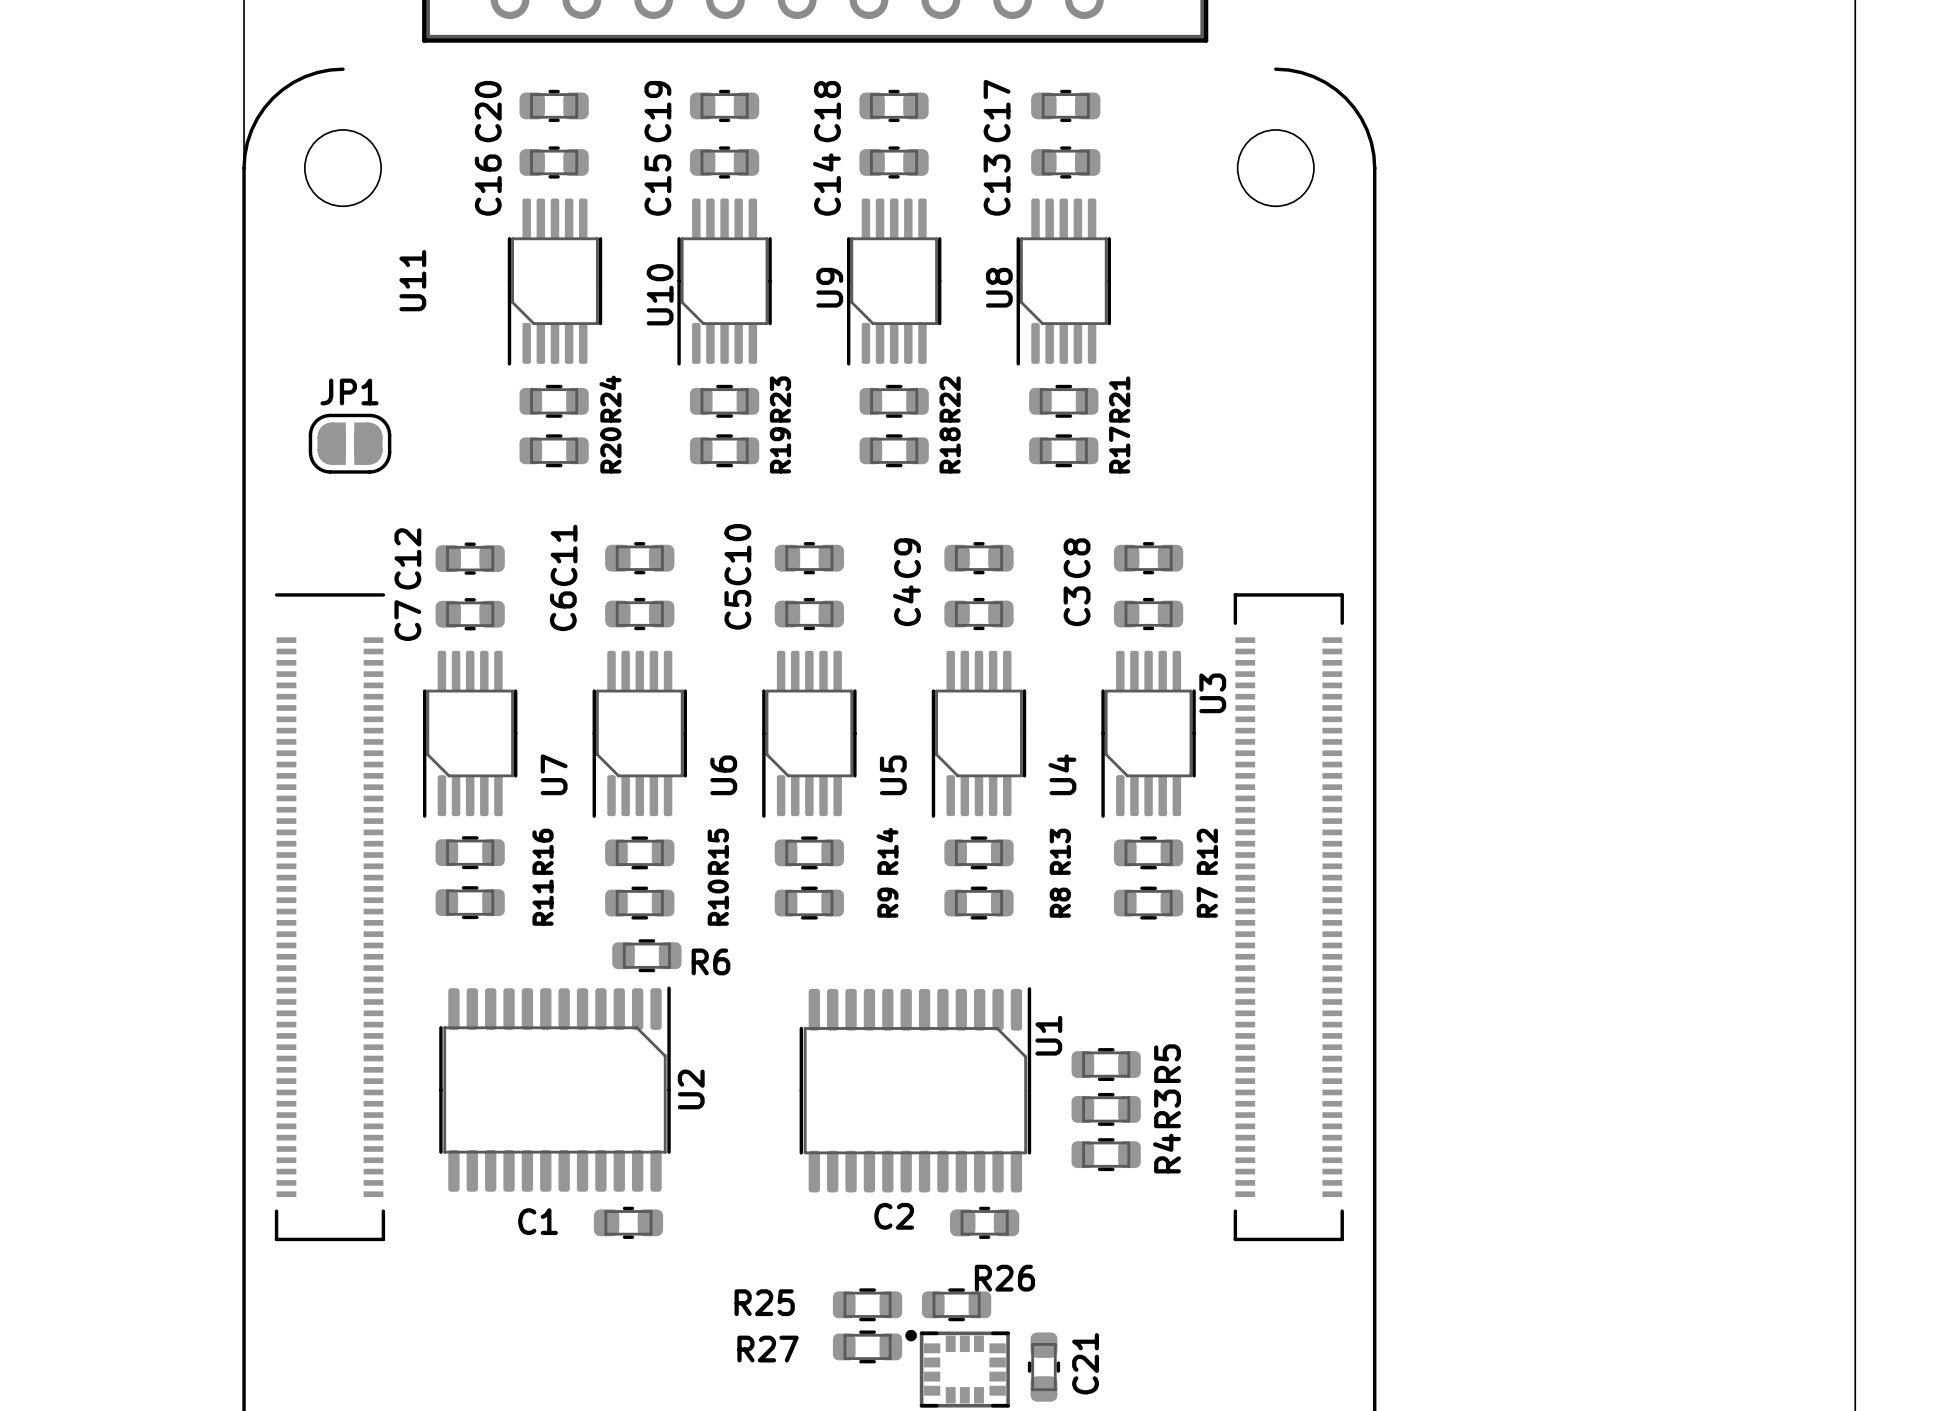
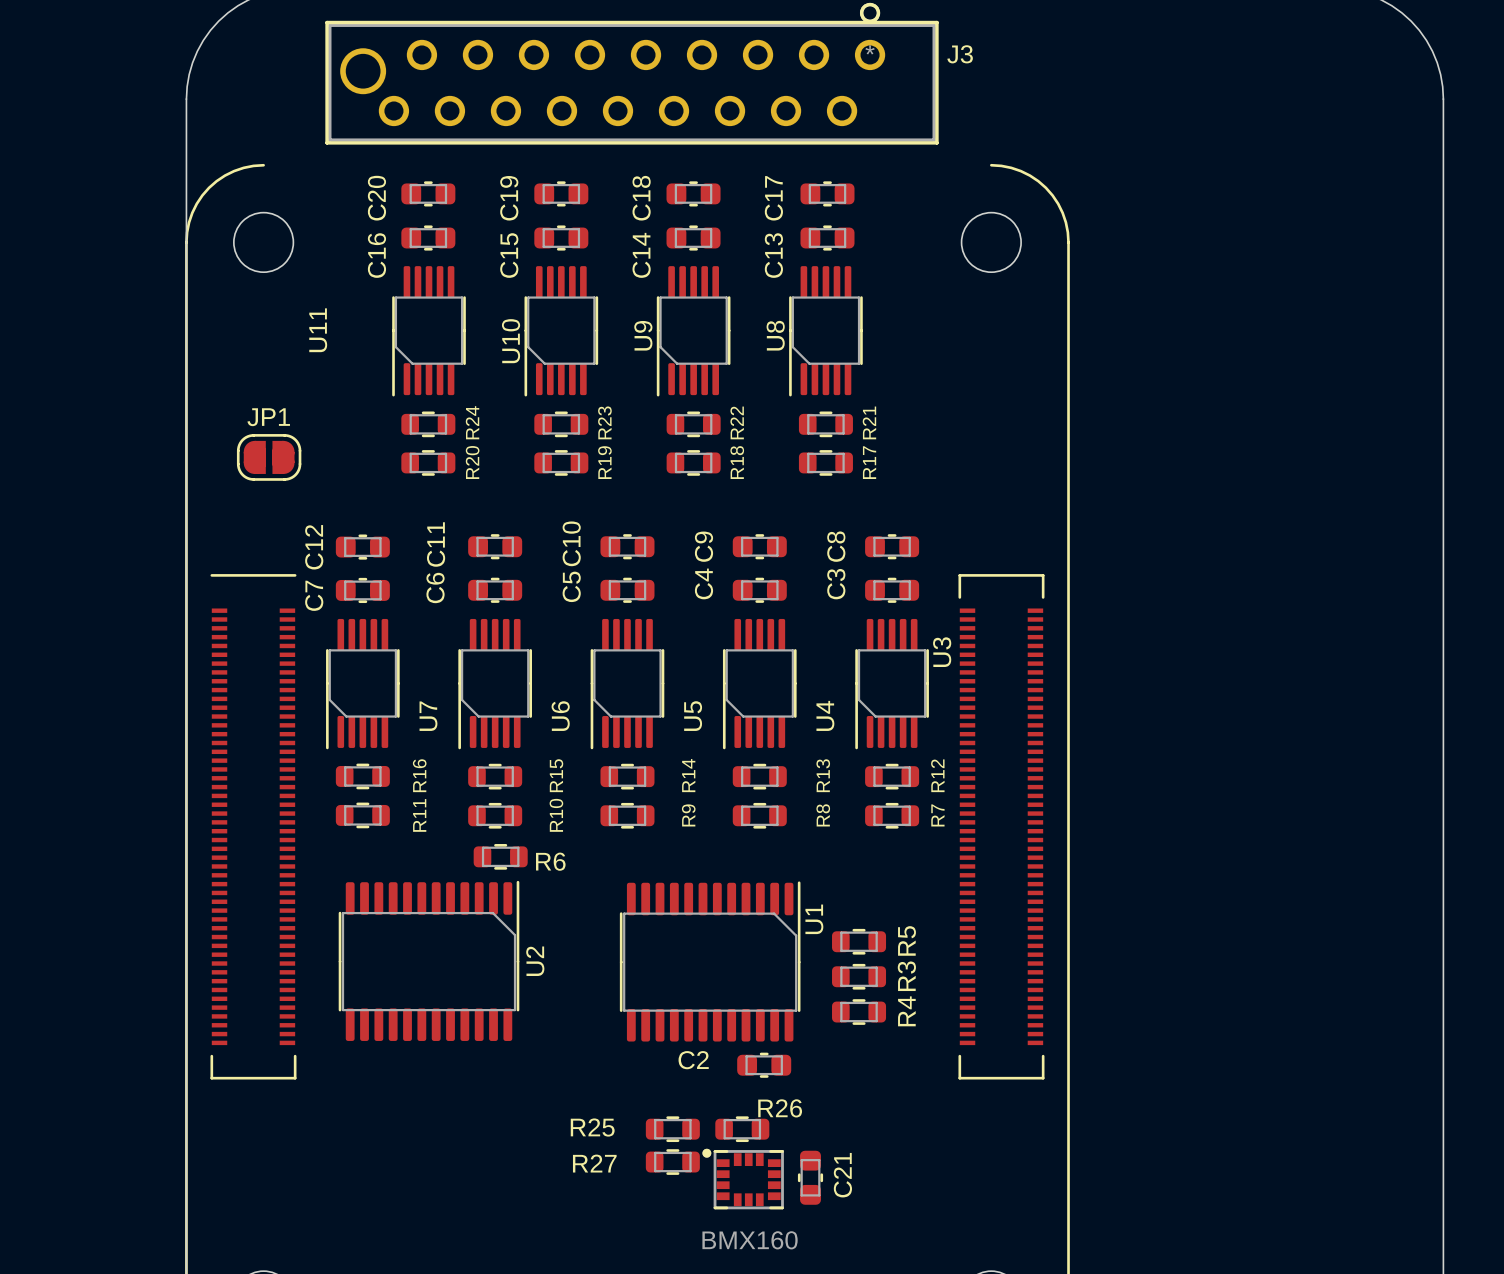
C1: (628, 1222) -> none

